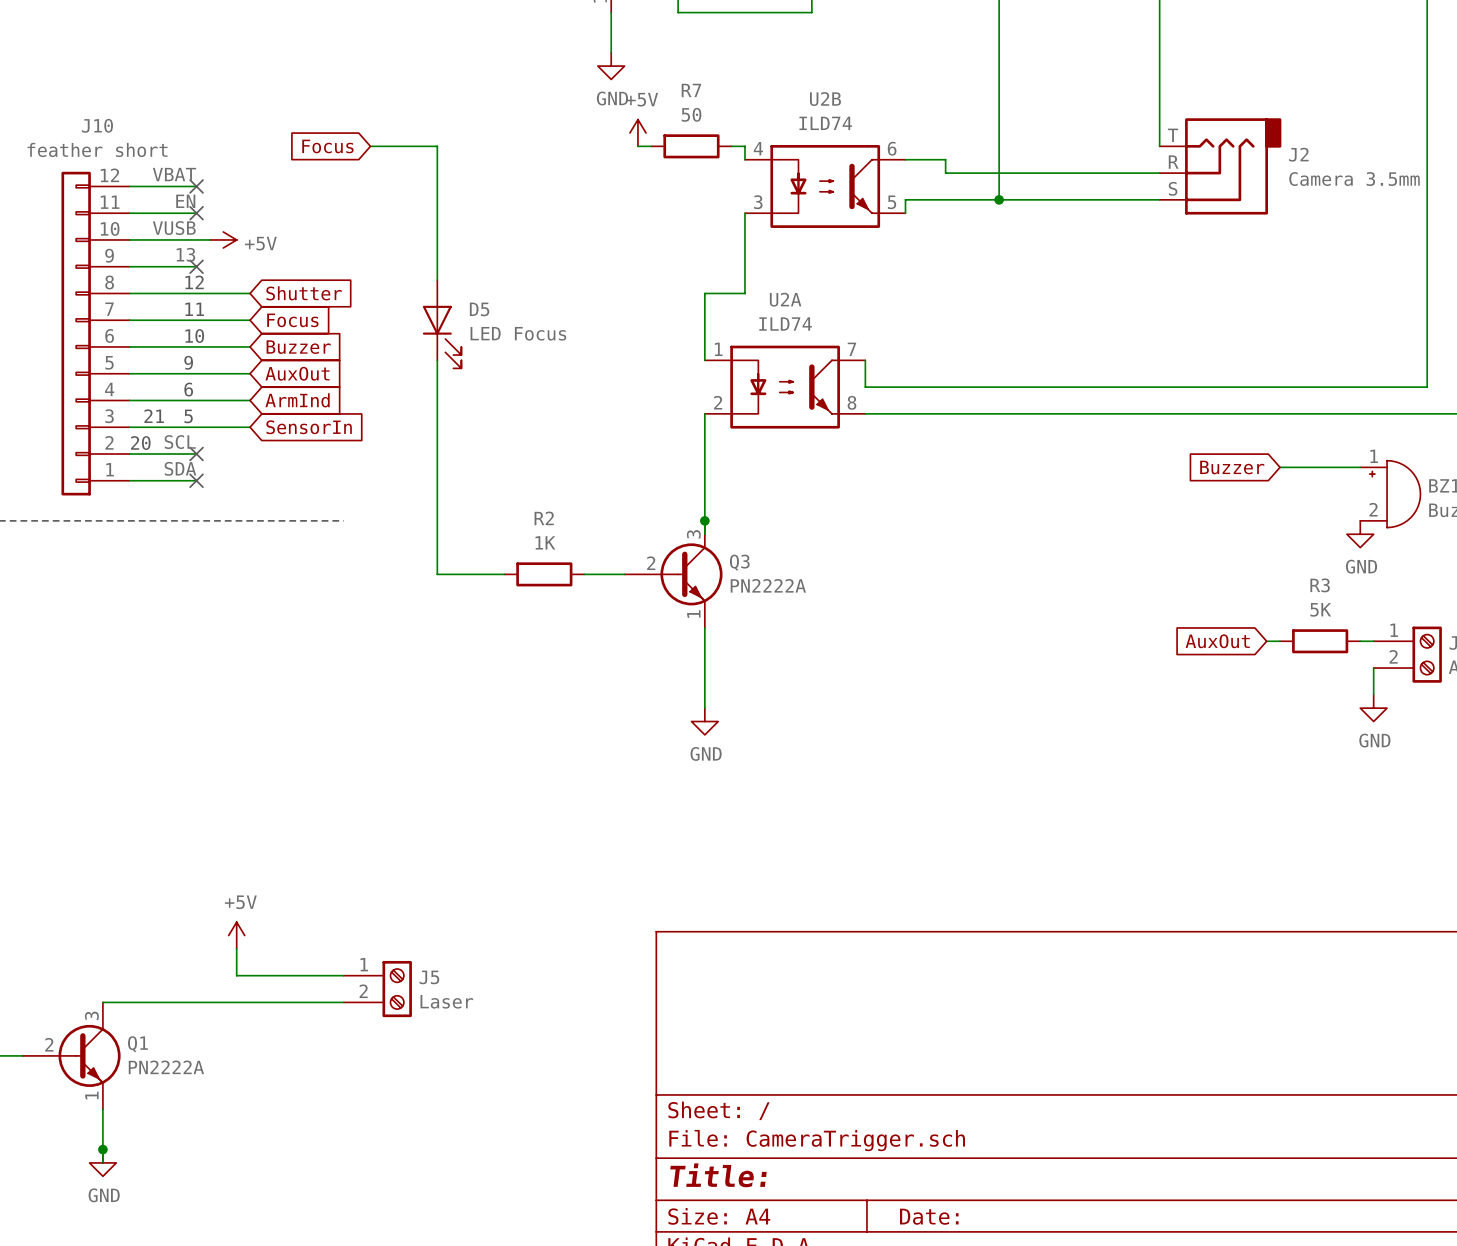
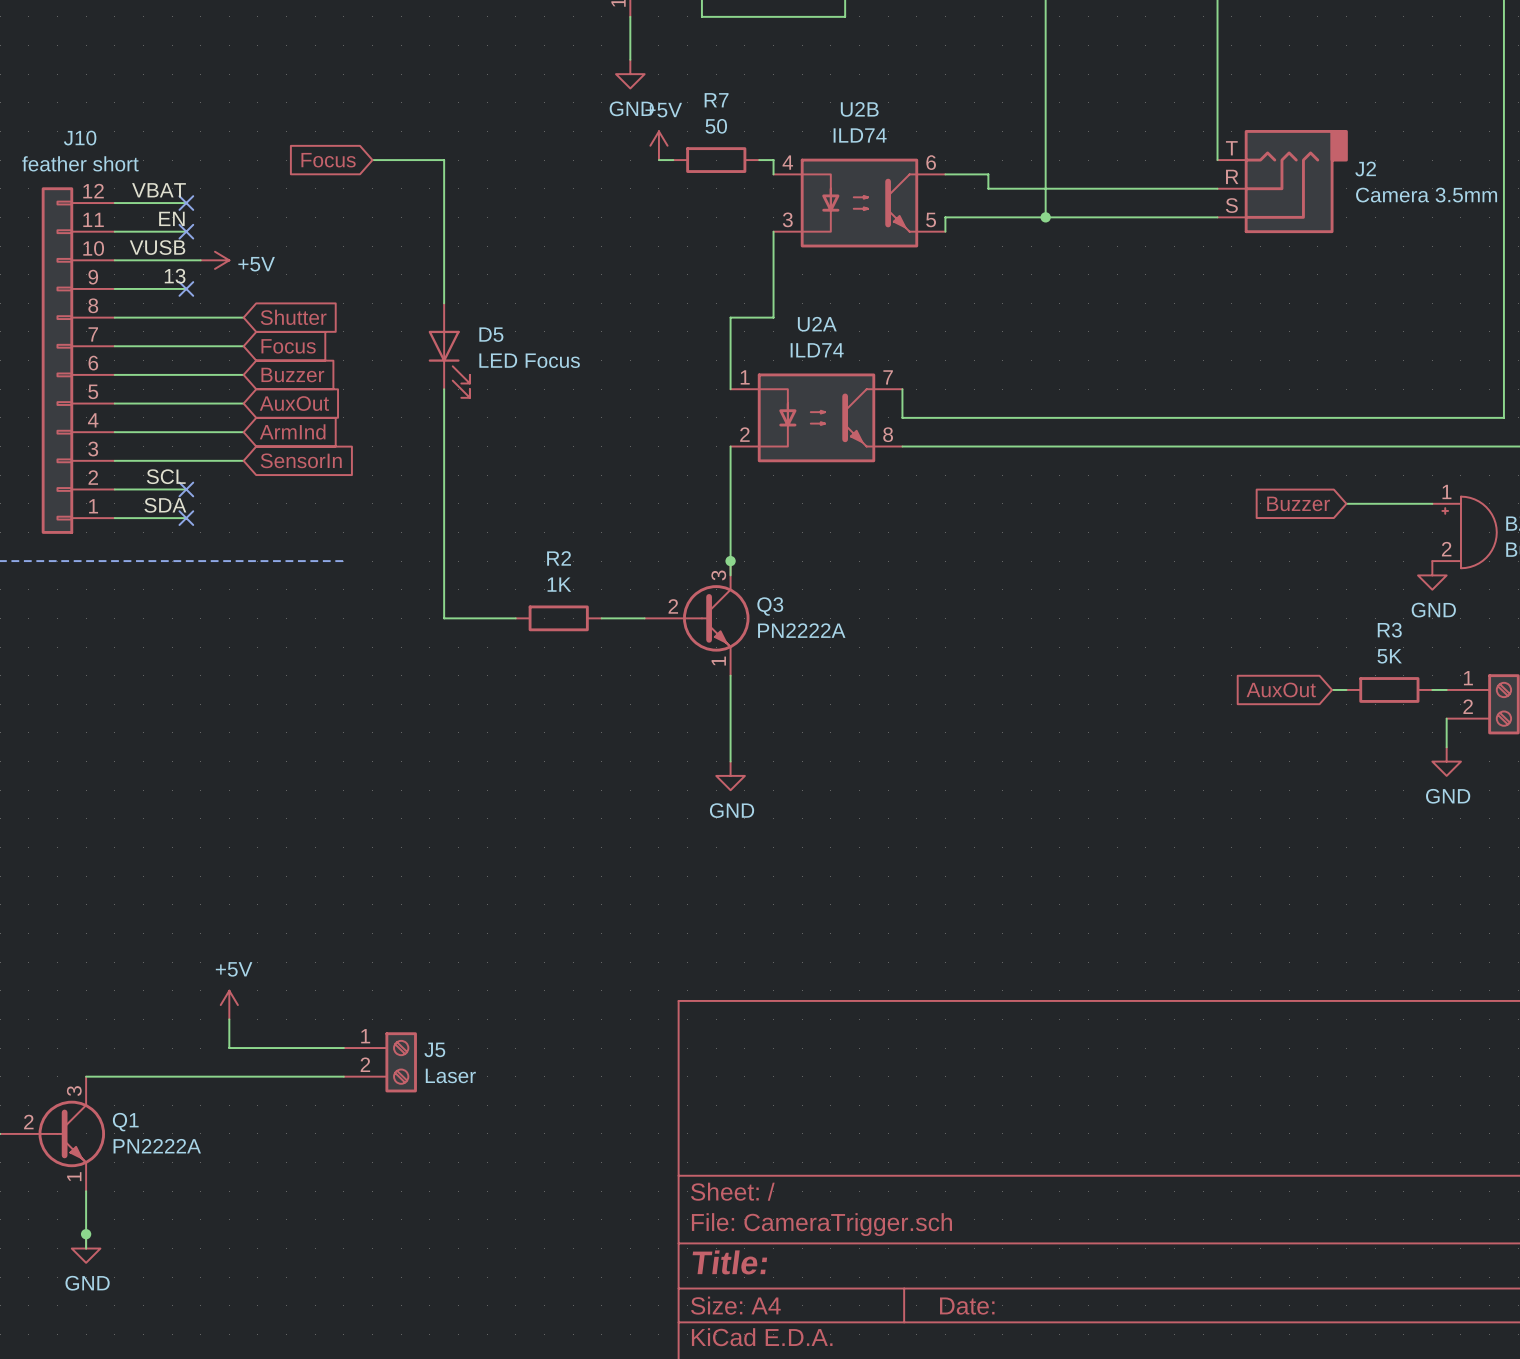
text: 12 (194, 282) -> none
text: 11 (194, 309) -> none
text: 10 (194, 336) -> none
text: 9 (188, 362) -> none
text: 6 (188, 389) -> none
text: 21 (154, 416) -> none
text: 5 (188, 416) -> none
text: 20 (140, 443) -> none

